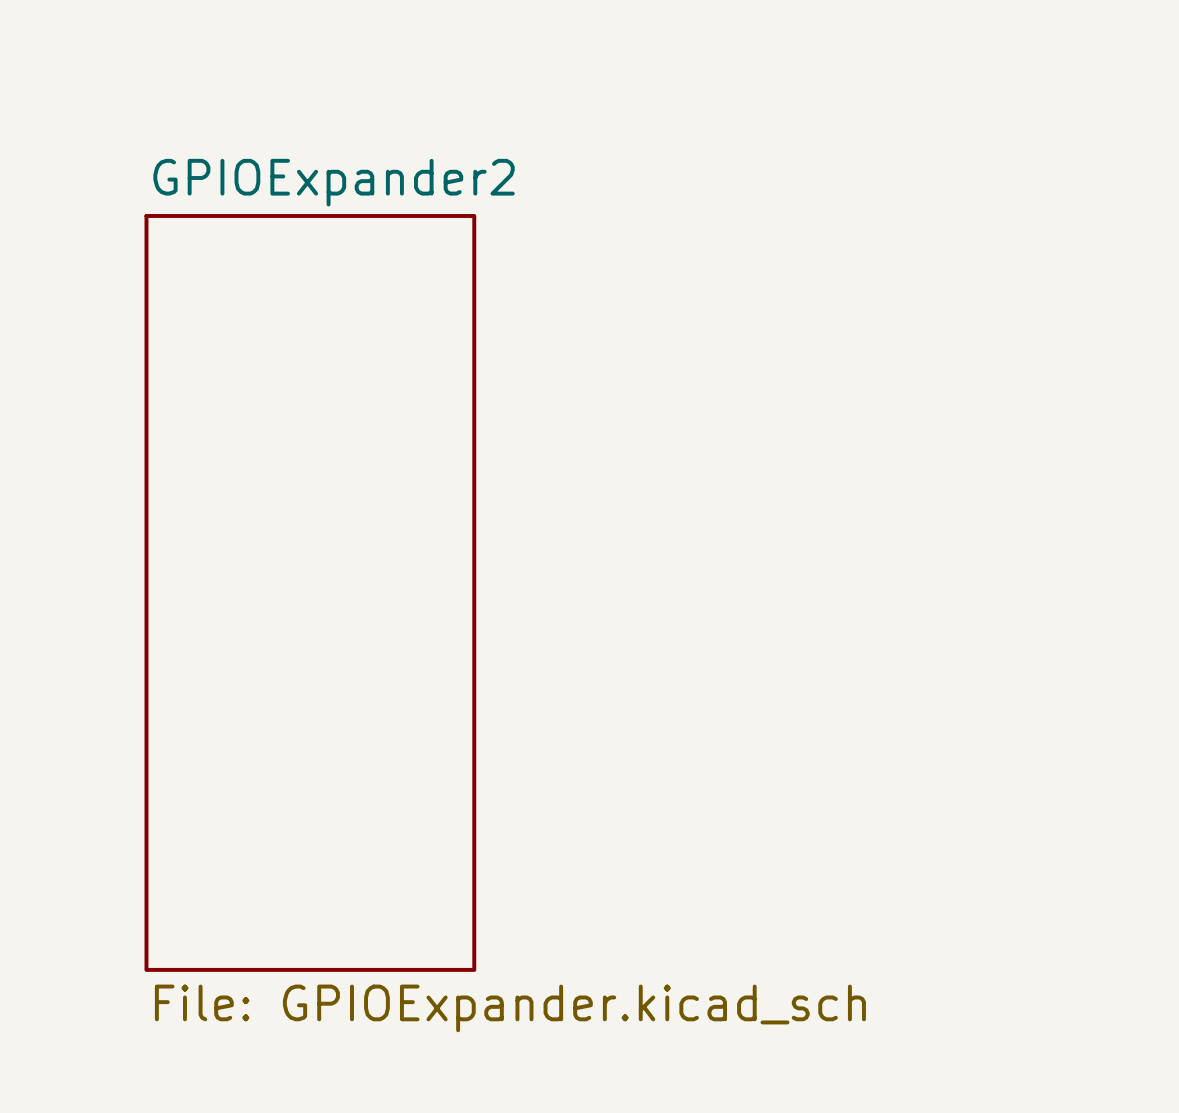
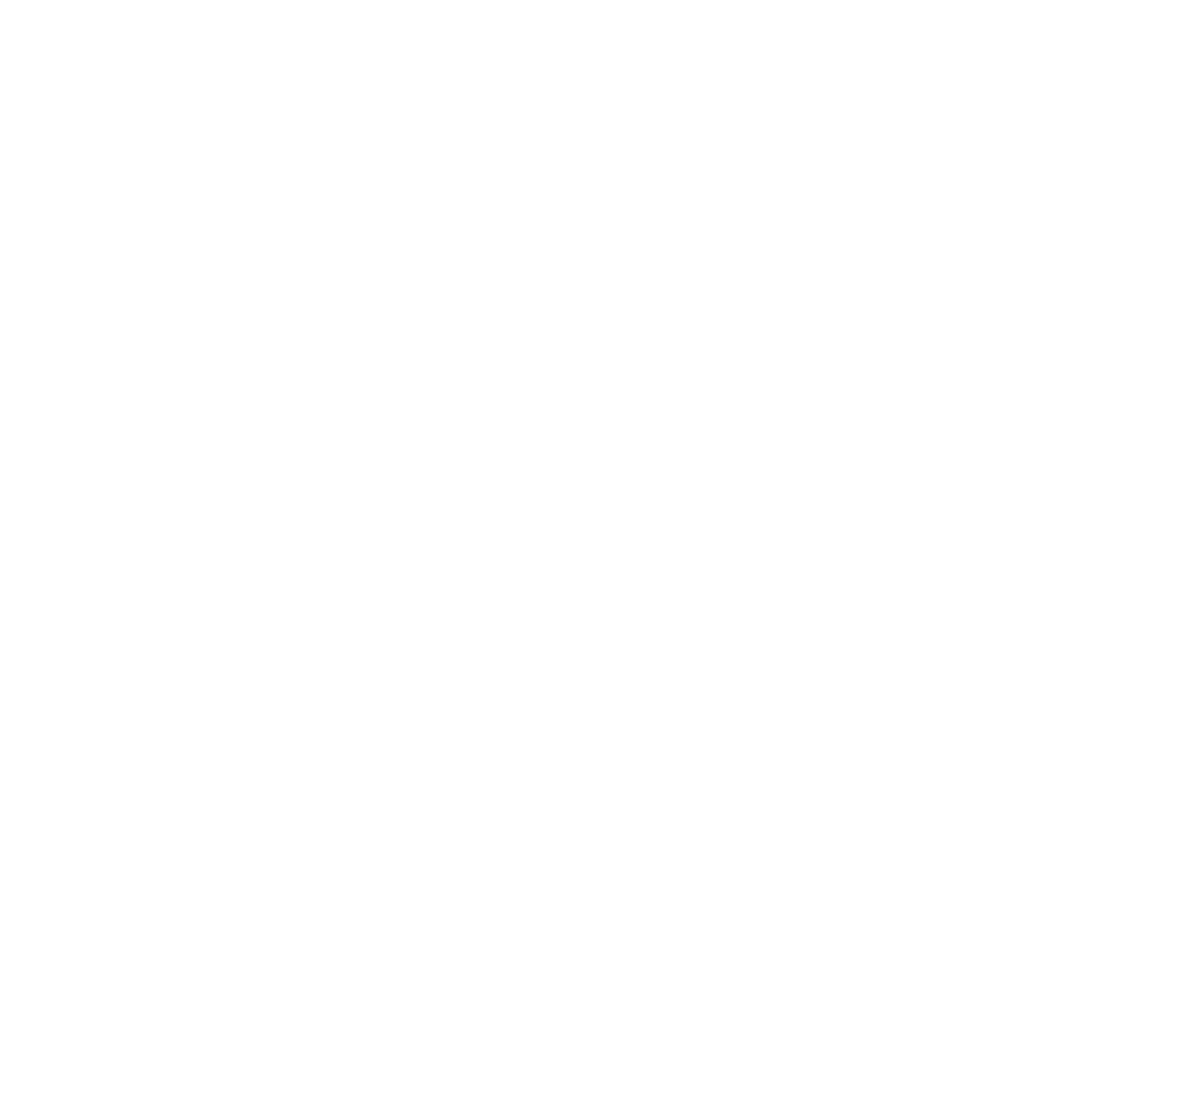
sheet GPIOExpander2: File: GPIOExpander.kicad_sch (310, 592) -> none

